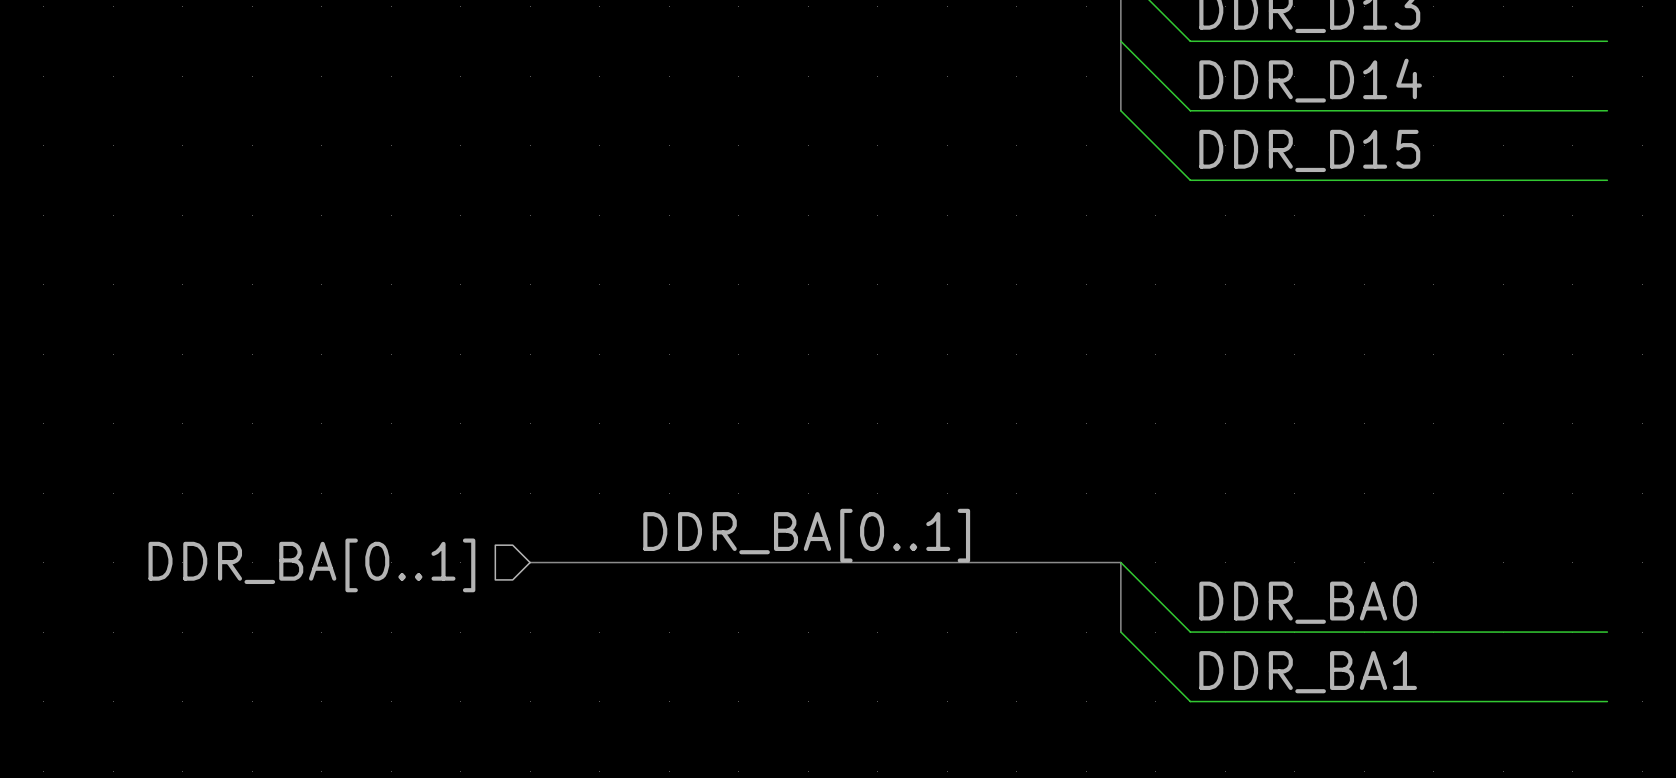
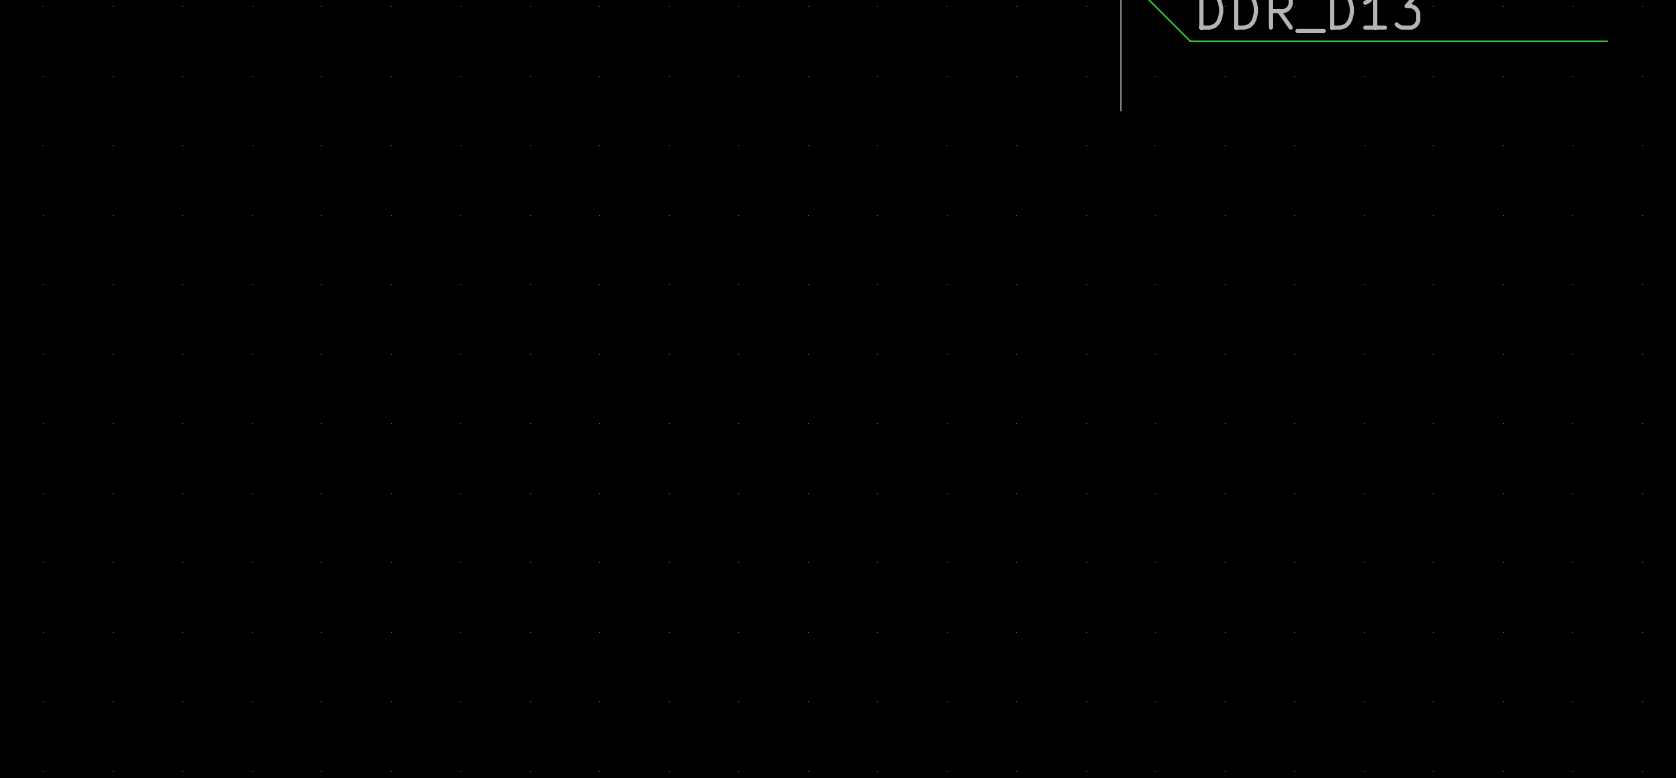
wire: (1120, 41) (1190, 110) (1607, 110) -> none
label: DDR_D14 (1310, 80) -> none
wire: (1120, 110) (1190, 180) (1607, 180) -> none
label: DDR_D15 (1309, 150) -> none
label: DDR_BA[0..1] (806, 535) -> none
bus: (530, 562) (1120, 562) (1120, 632) -> none
wire: (1120, 562) (1190, 632) (1607, 632) -> none
hierarchical label: DDR_BA[0..1] (311, 565) -> none
label: DDR_BA0 (1308, 602) -> none
wire: (1120, 632) (1190, 701) (1607, 701) -> none
label: DDR_BA1 (1308, 672) -> none

